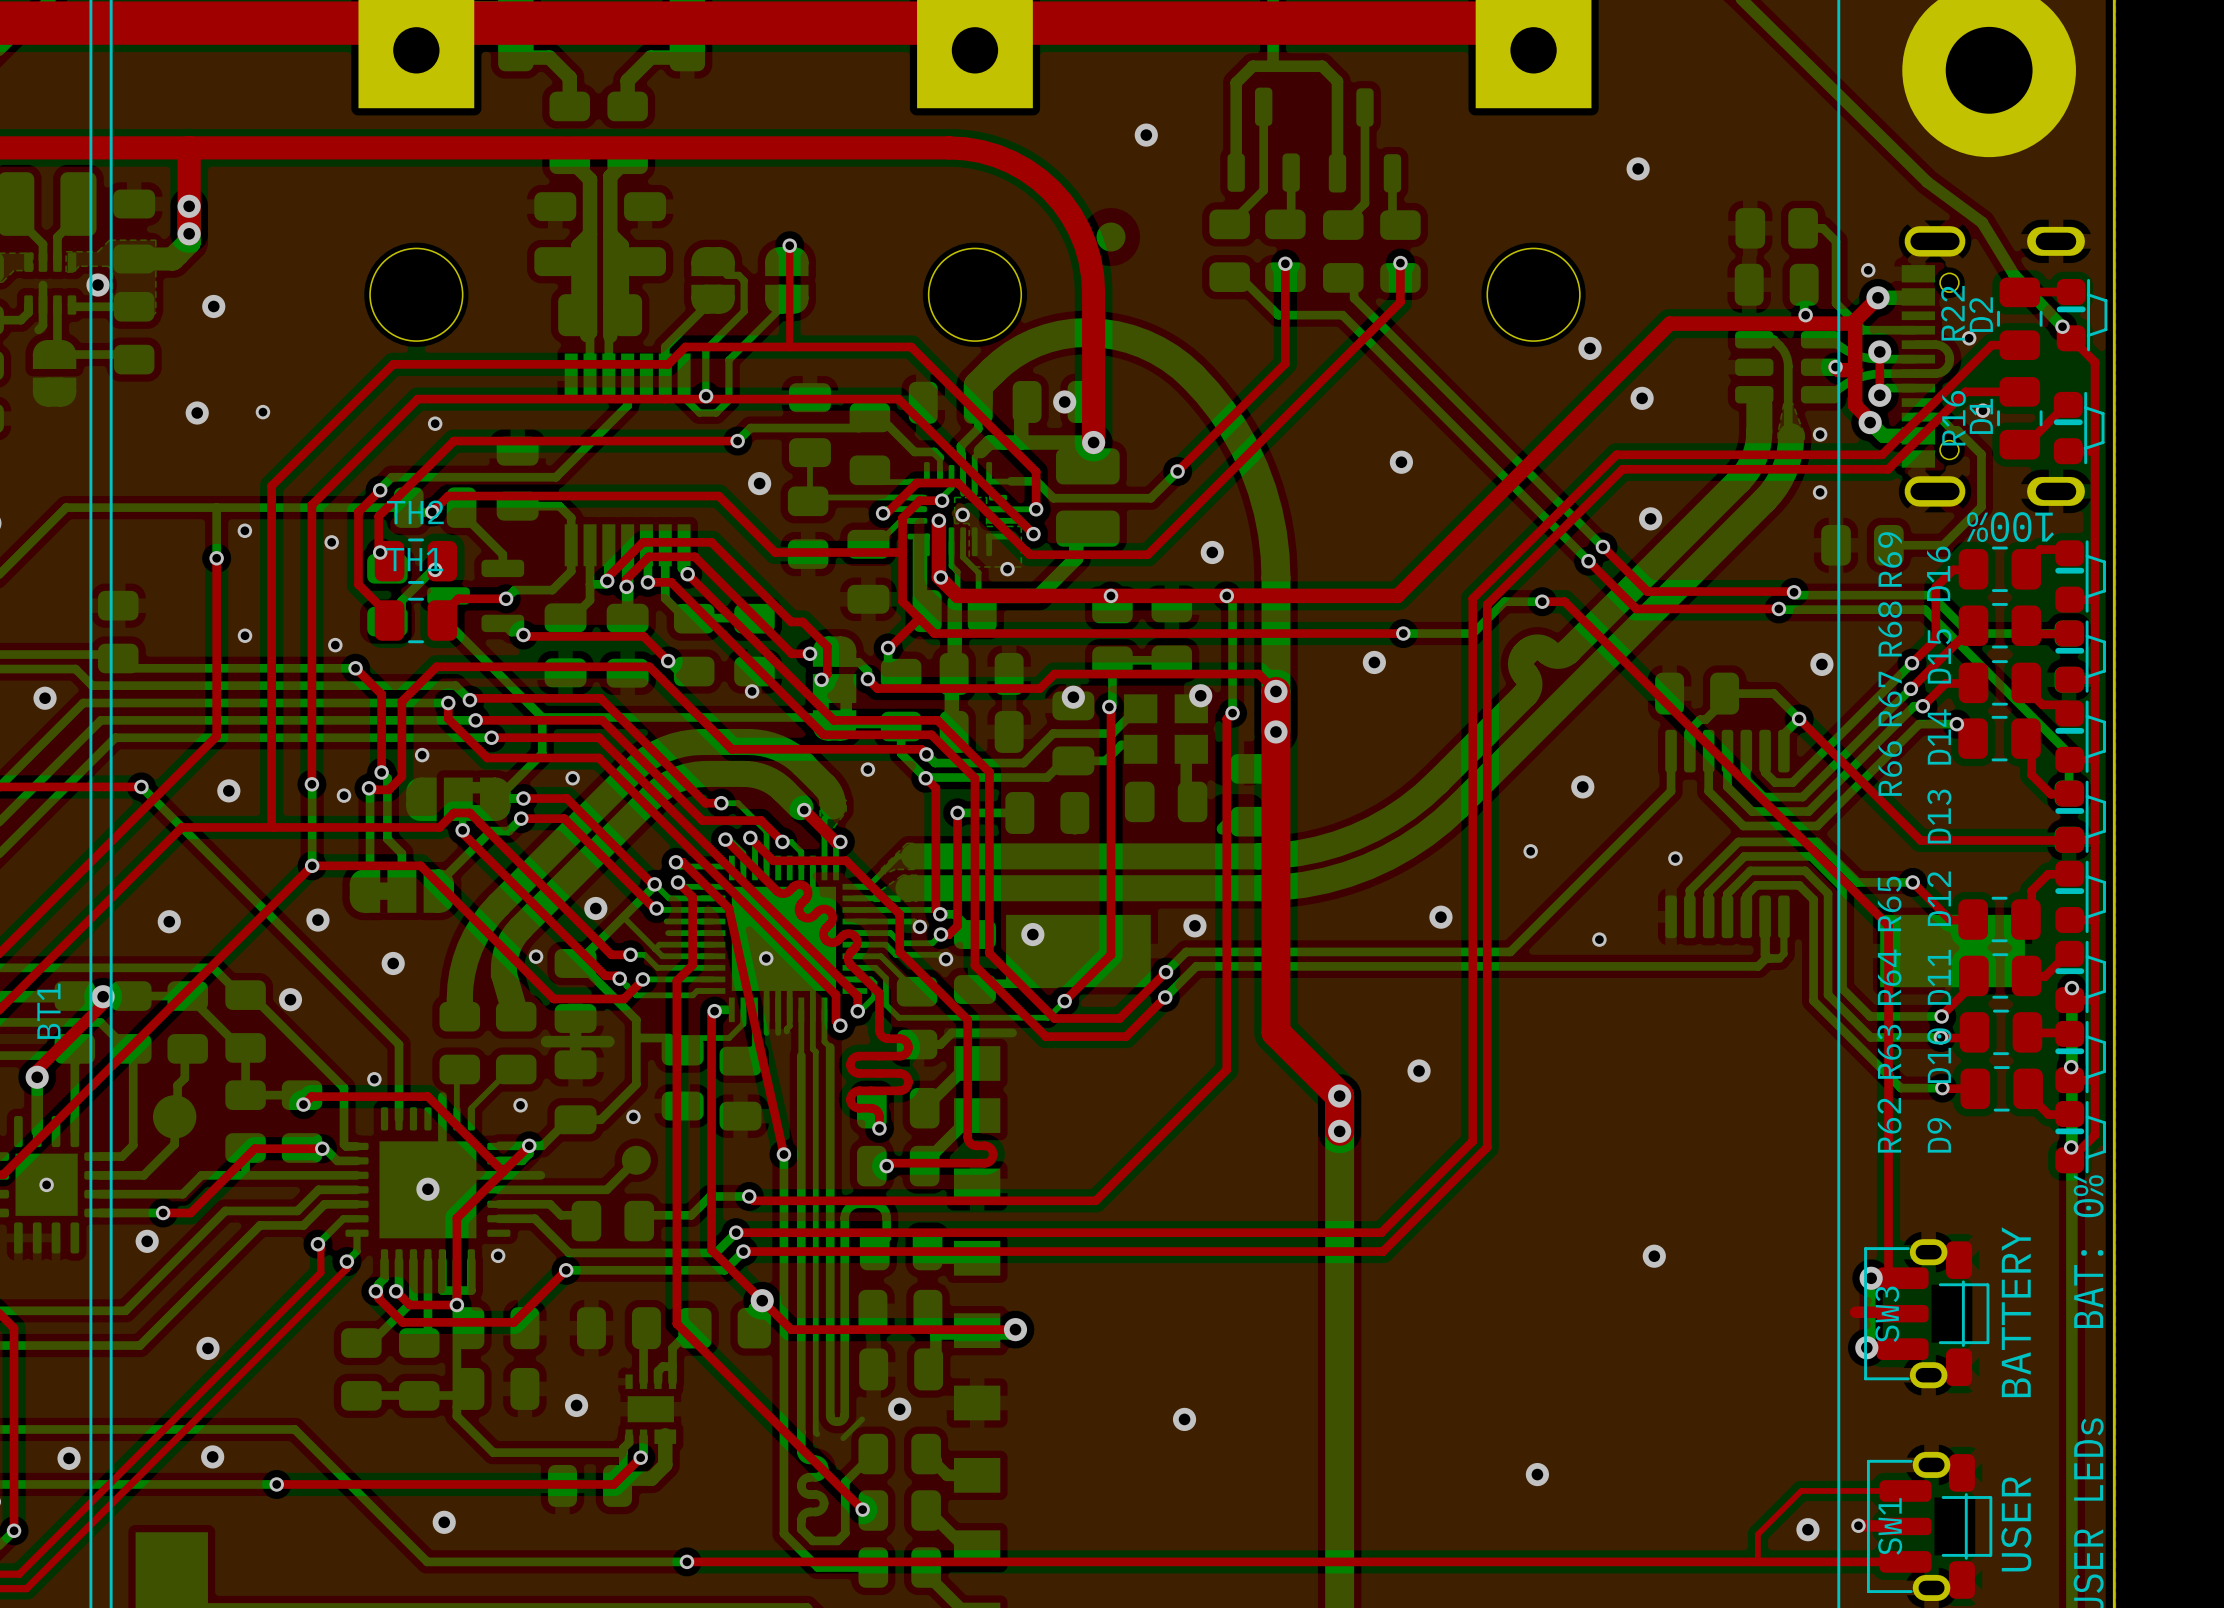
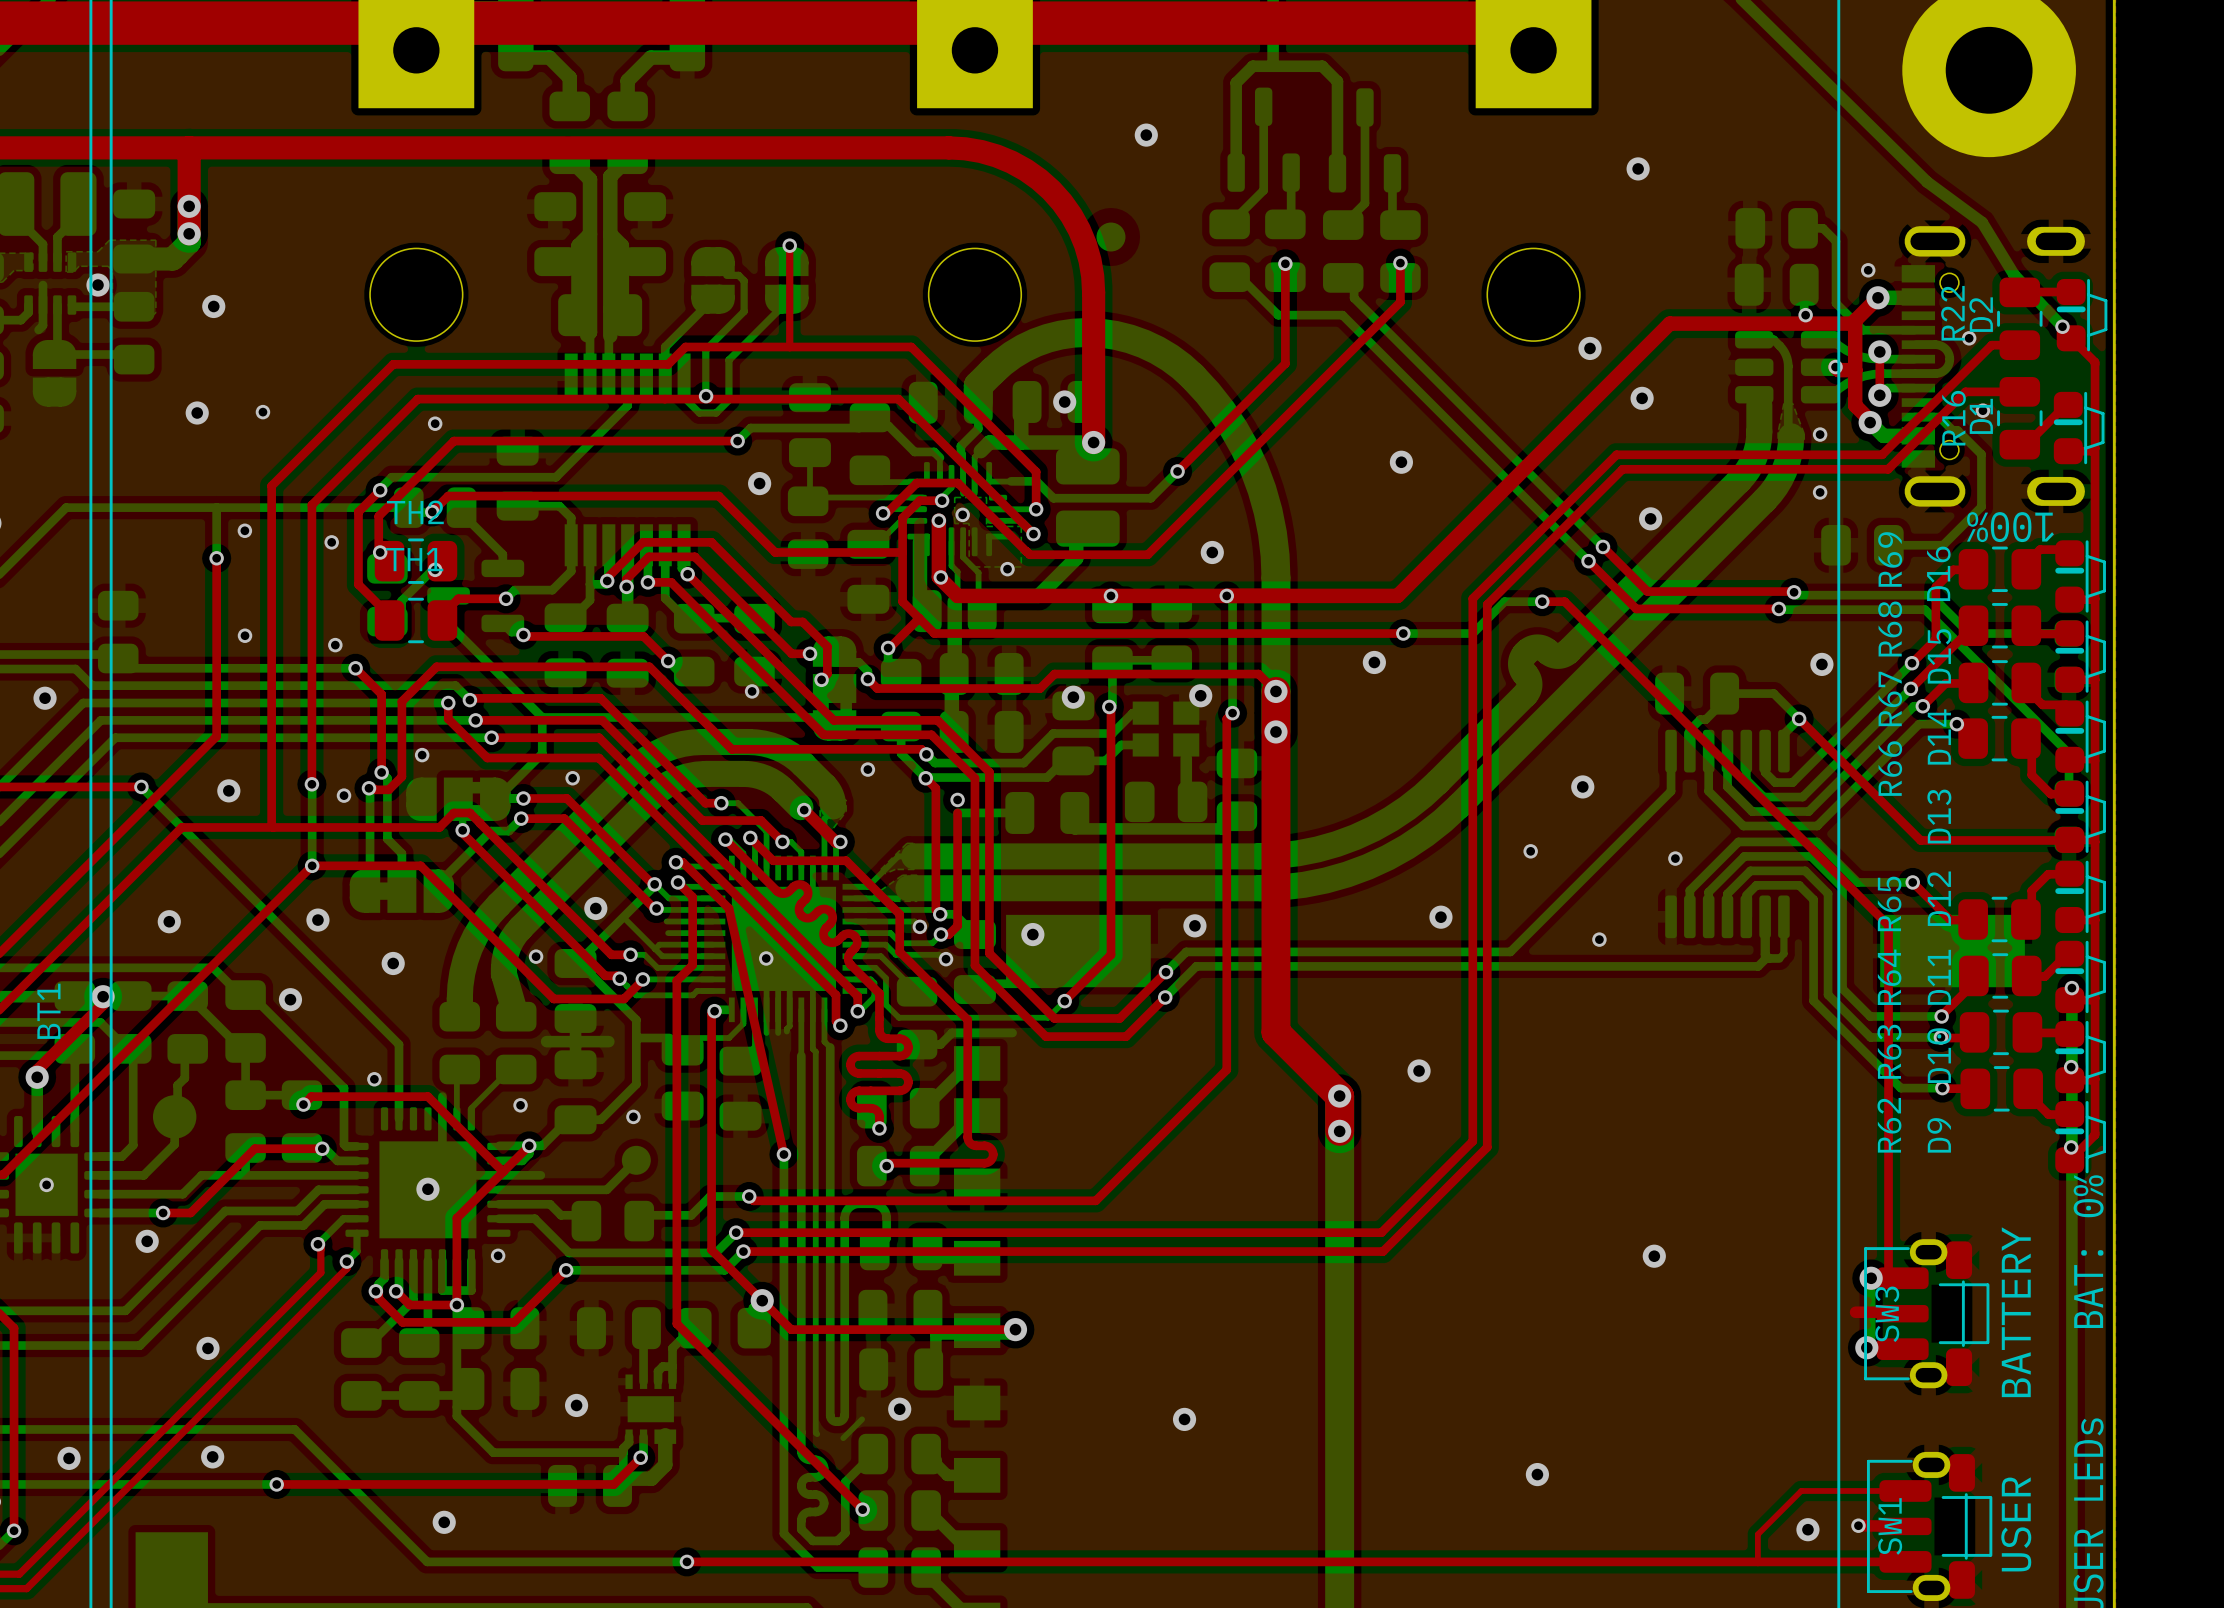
part footprint: [1124, 694, 1208, 764] -> [1132, 701, 1200, 757]
part position: (1250, 795) -> (1236, 789)
via position: (957, 812) -> (957, 799)
bottom track: none -> (1074, 828) (1222, 828)

